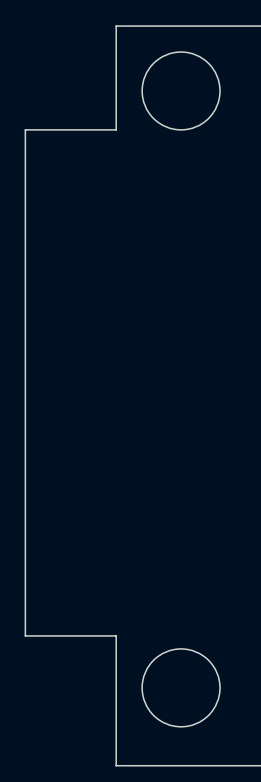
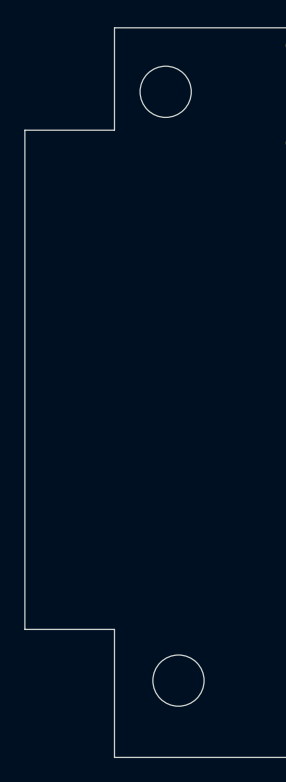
round board edge size: [141, 51, 221, 131] -> [139, 65, 192, 119]
round board edge size: [141, 648, 221, 728] -> [152, 654, 205, 707]

